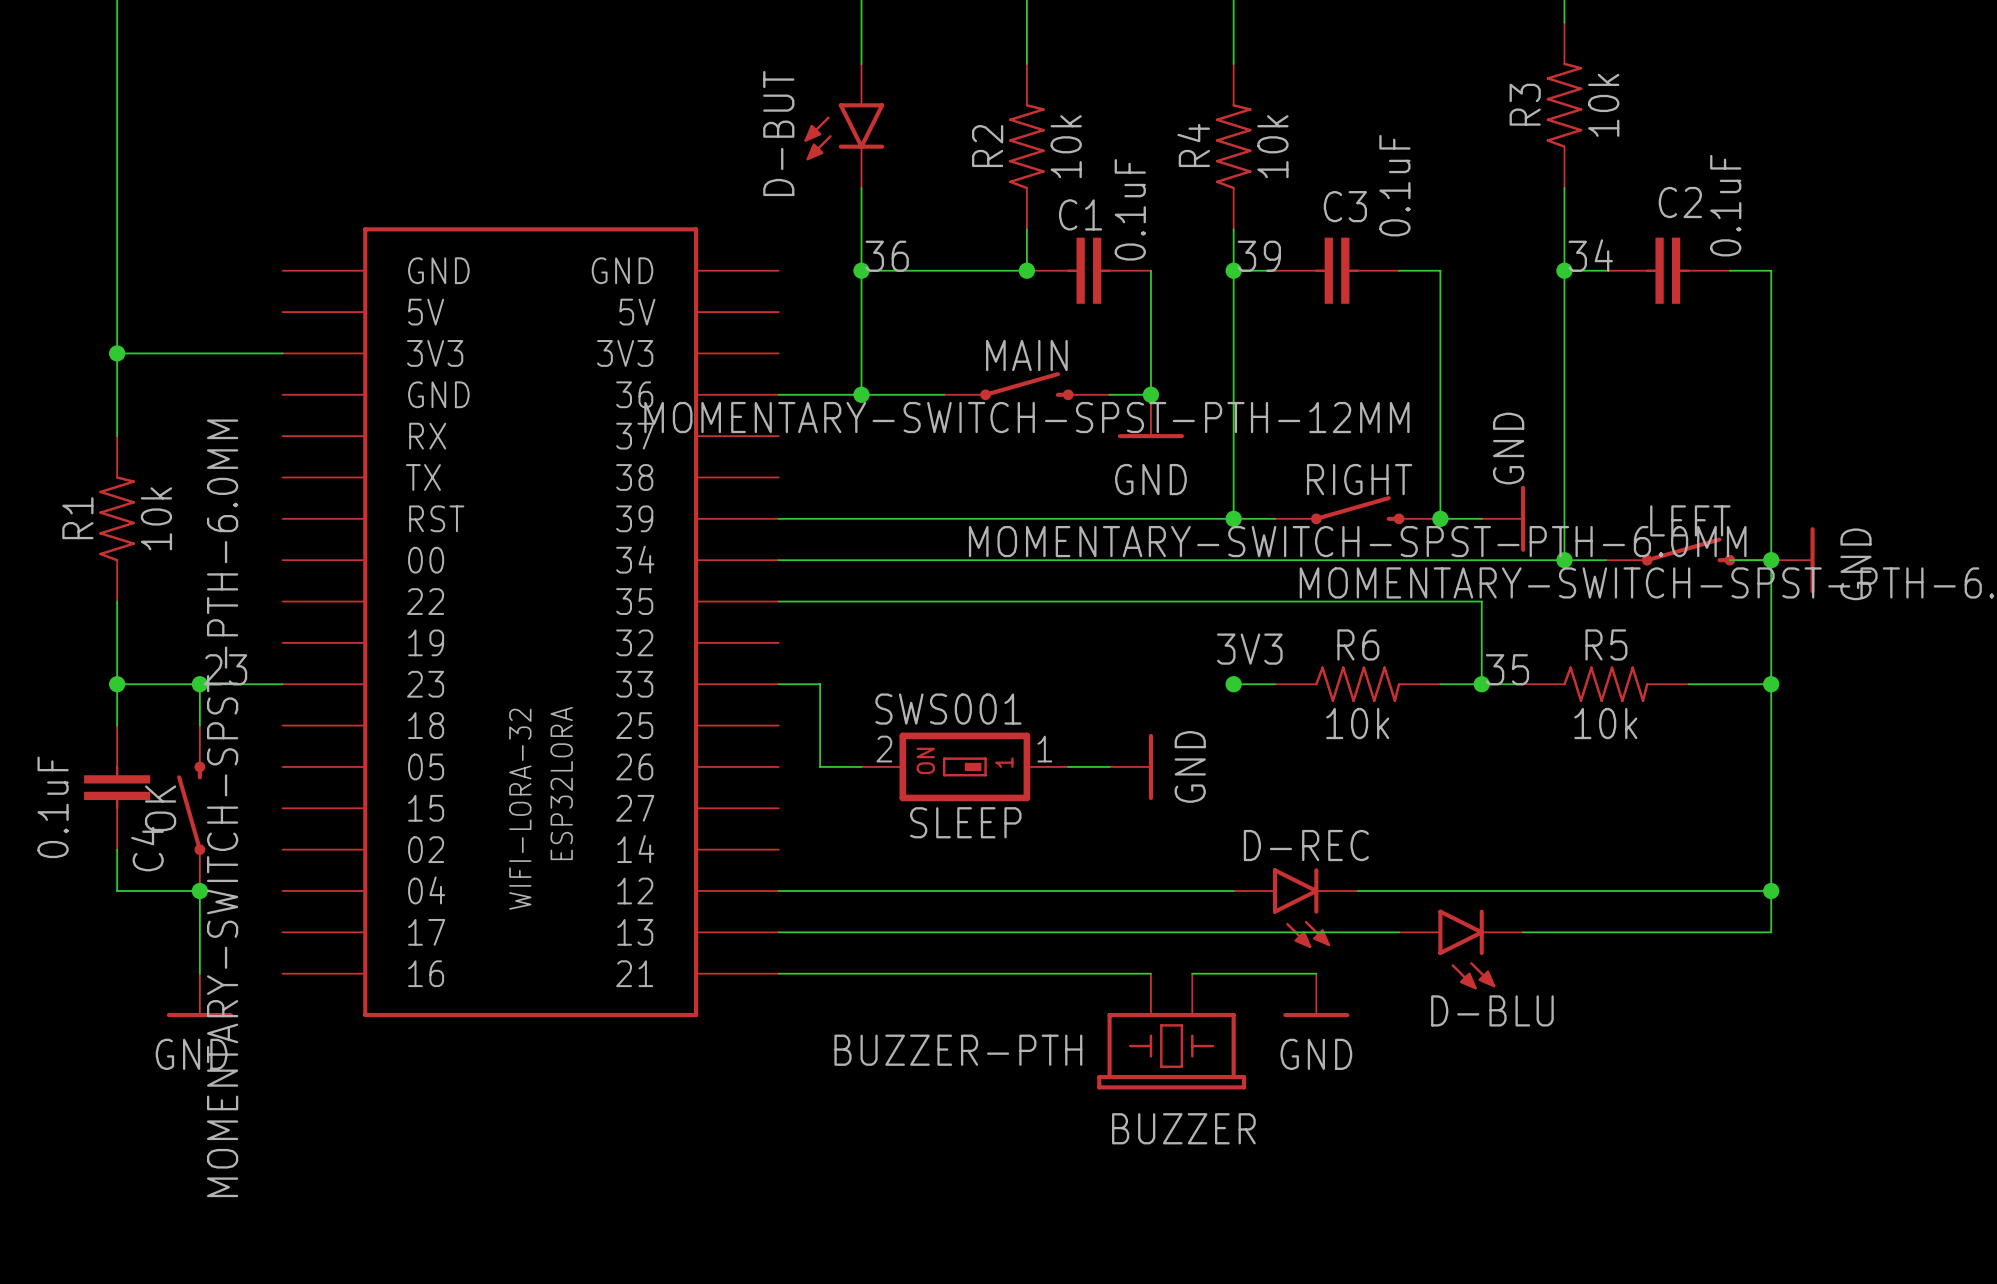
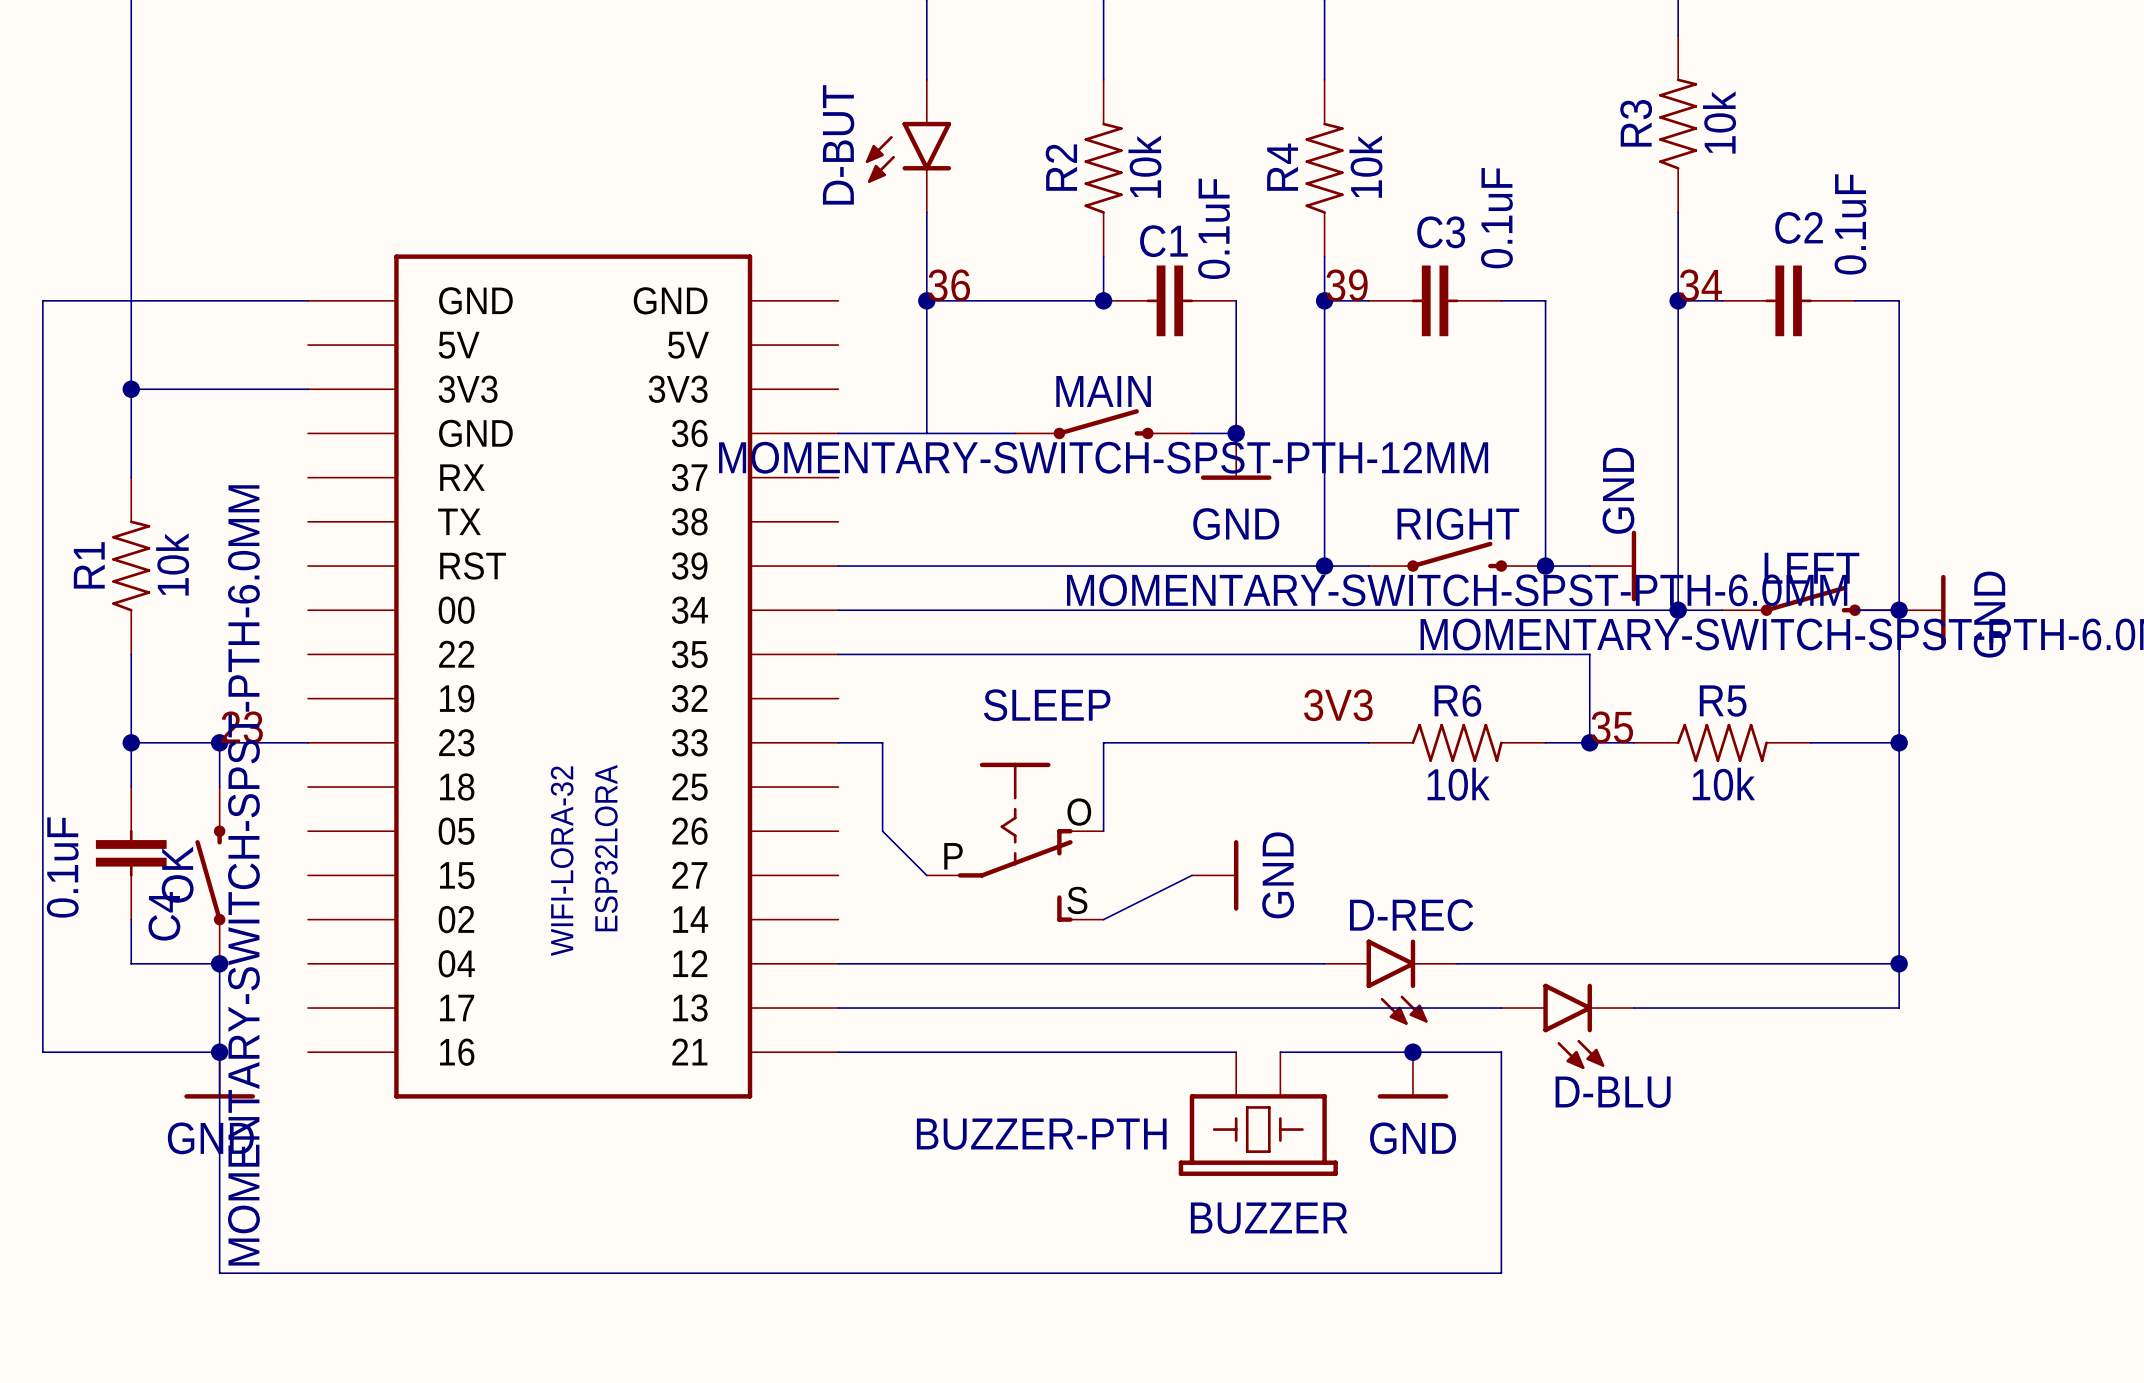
wire: none -> (308, 300) (42, 300) (42, 1052) (219, 1052) (219, 1273) (1501, 1273) (1501, 1052) (1412, 1052)
junction: (861, 394) -> none
wire: none -> (1324, 742) (1103, 742) (1103, 831)
junction: (1233, 684) -> none
wire: (820, 766) (861, 766) -> (882, 831) (926, 875)
SLEEP: SWS001 (964, 766) -> none
wire: (1068, 766) (1109, 766) -> none
power symbol position: GND (1131, 766) -> GND (1215, 875)
SLEEP: none -> (1015, 842)
wire: none -> (1191, 875) (1103, 919)
junction: none -> (219, 1052)
junction: none -> (1412, 1052)

